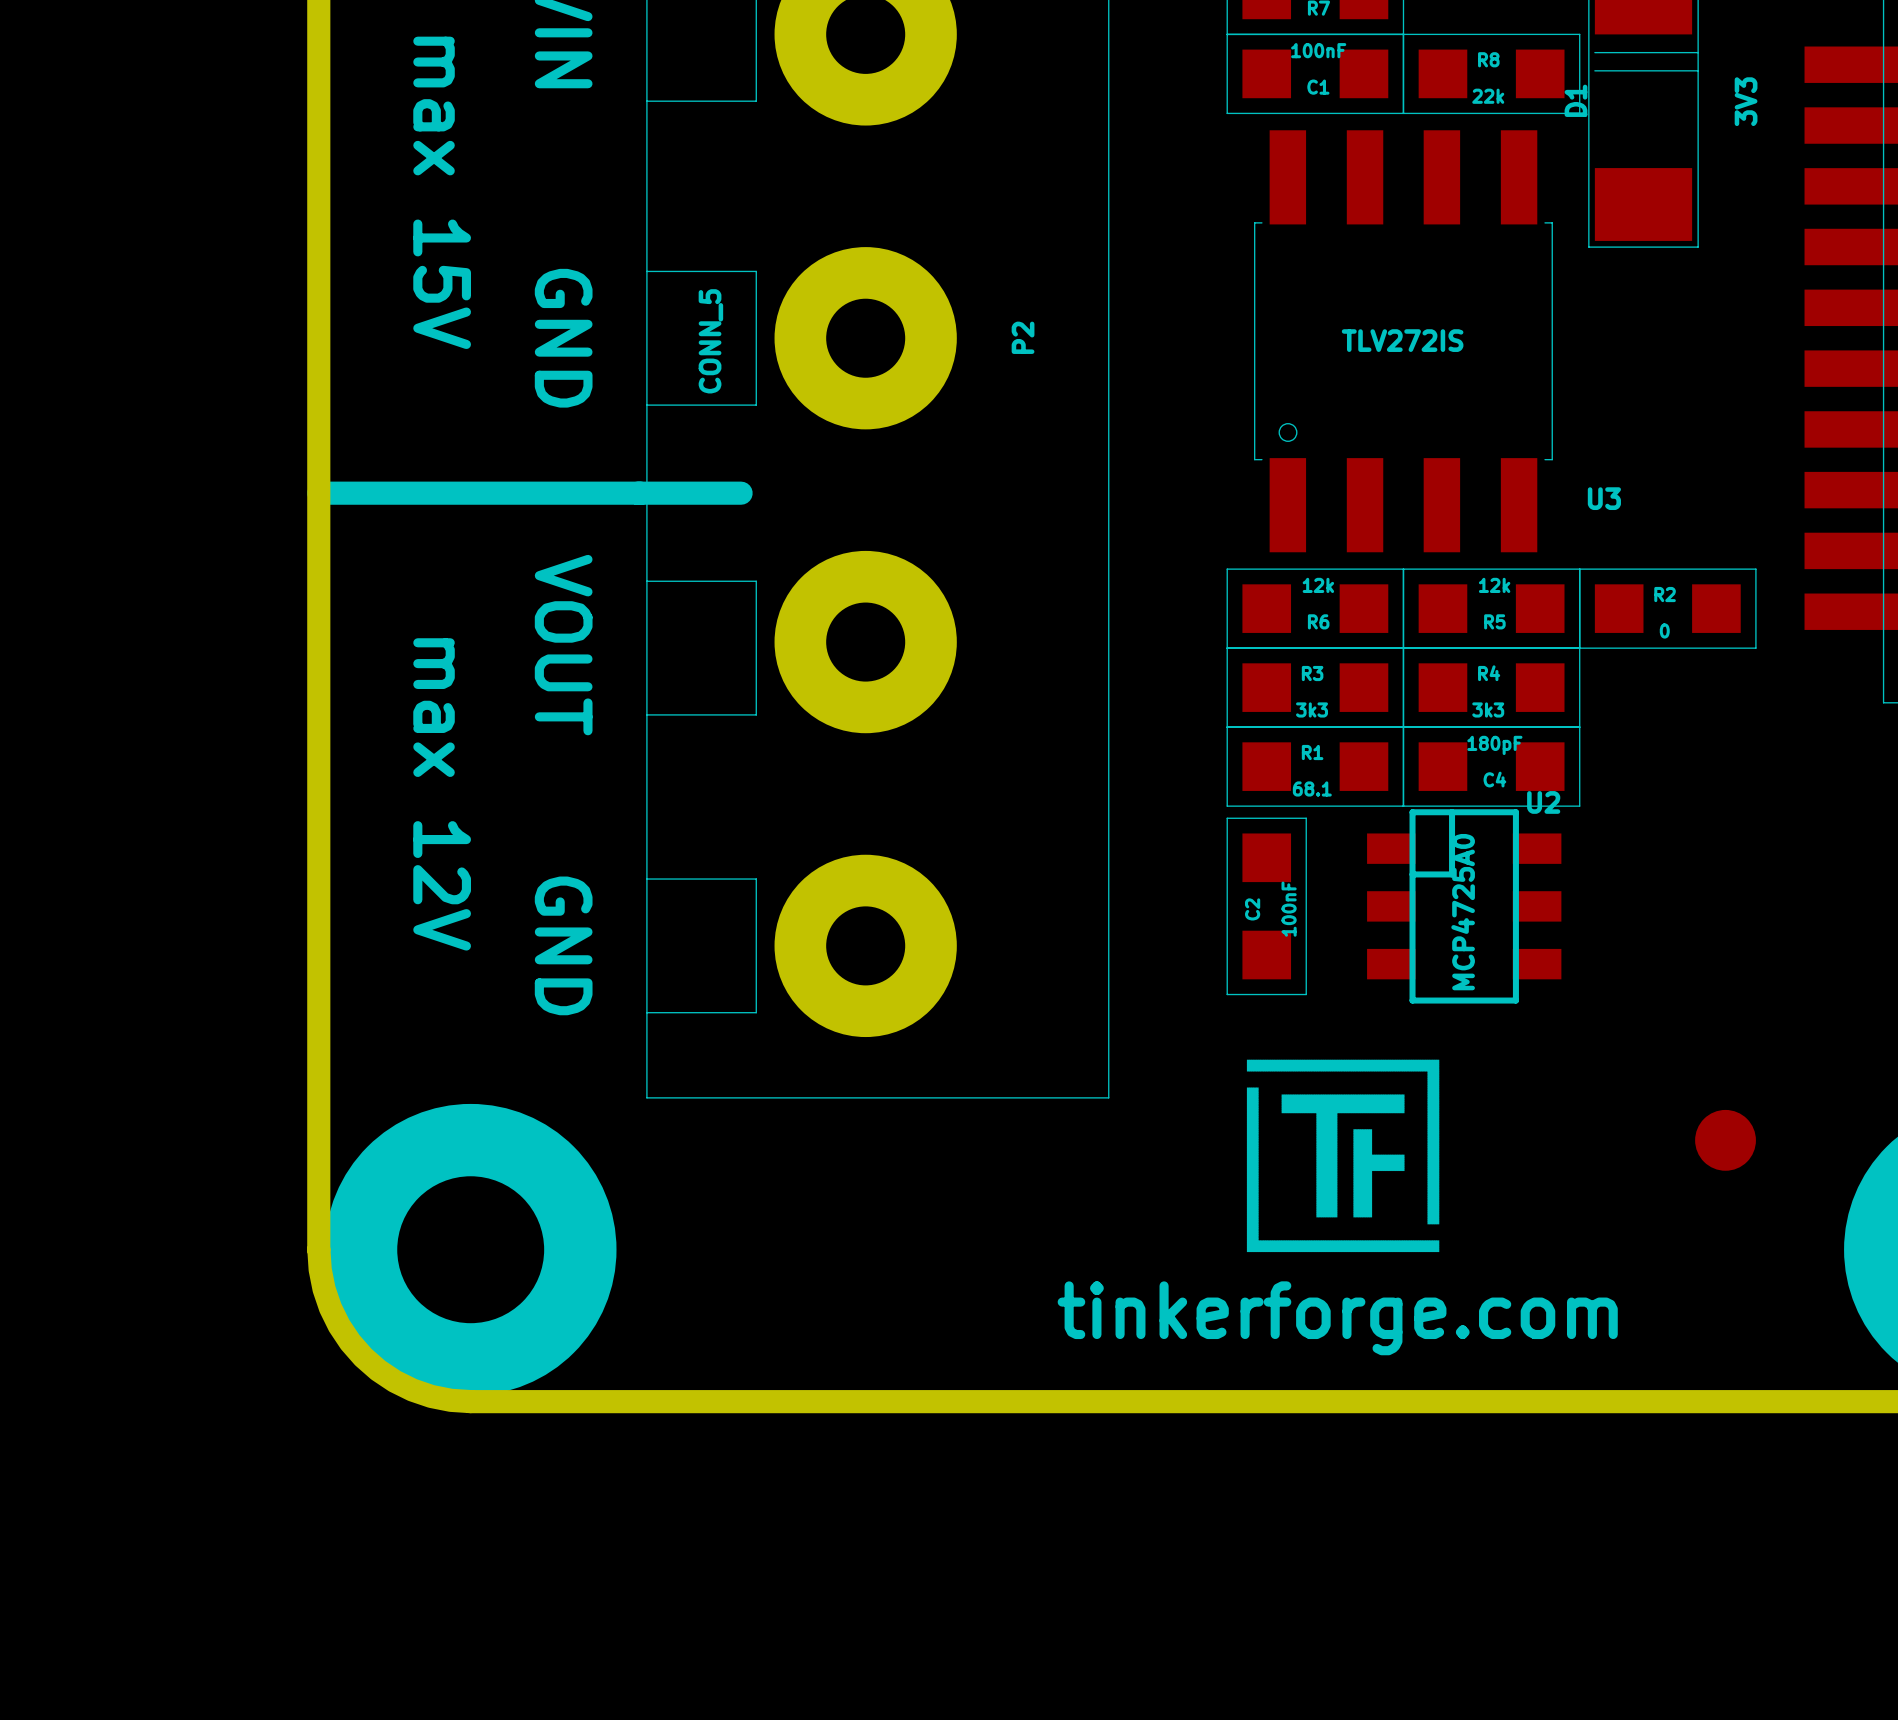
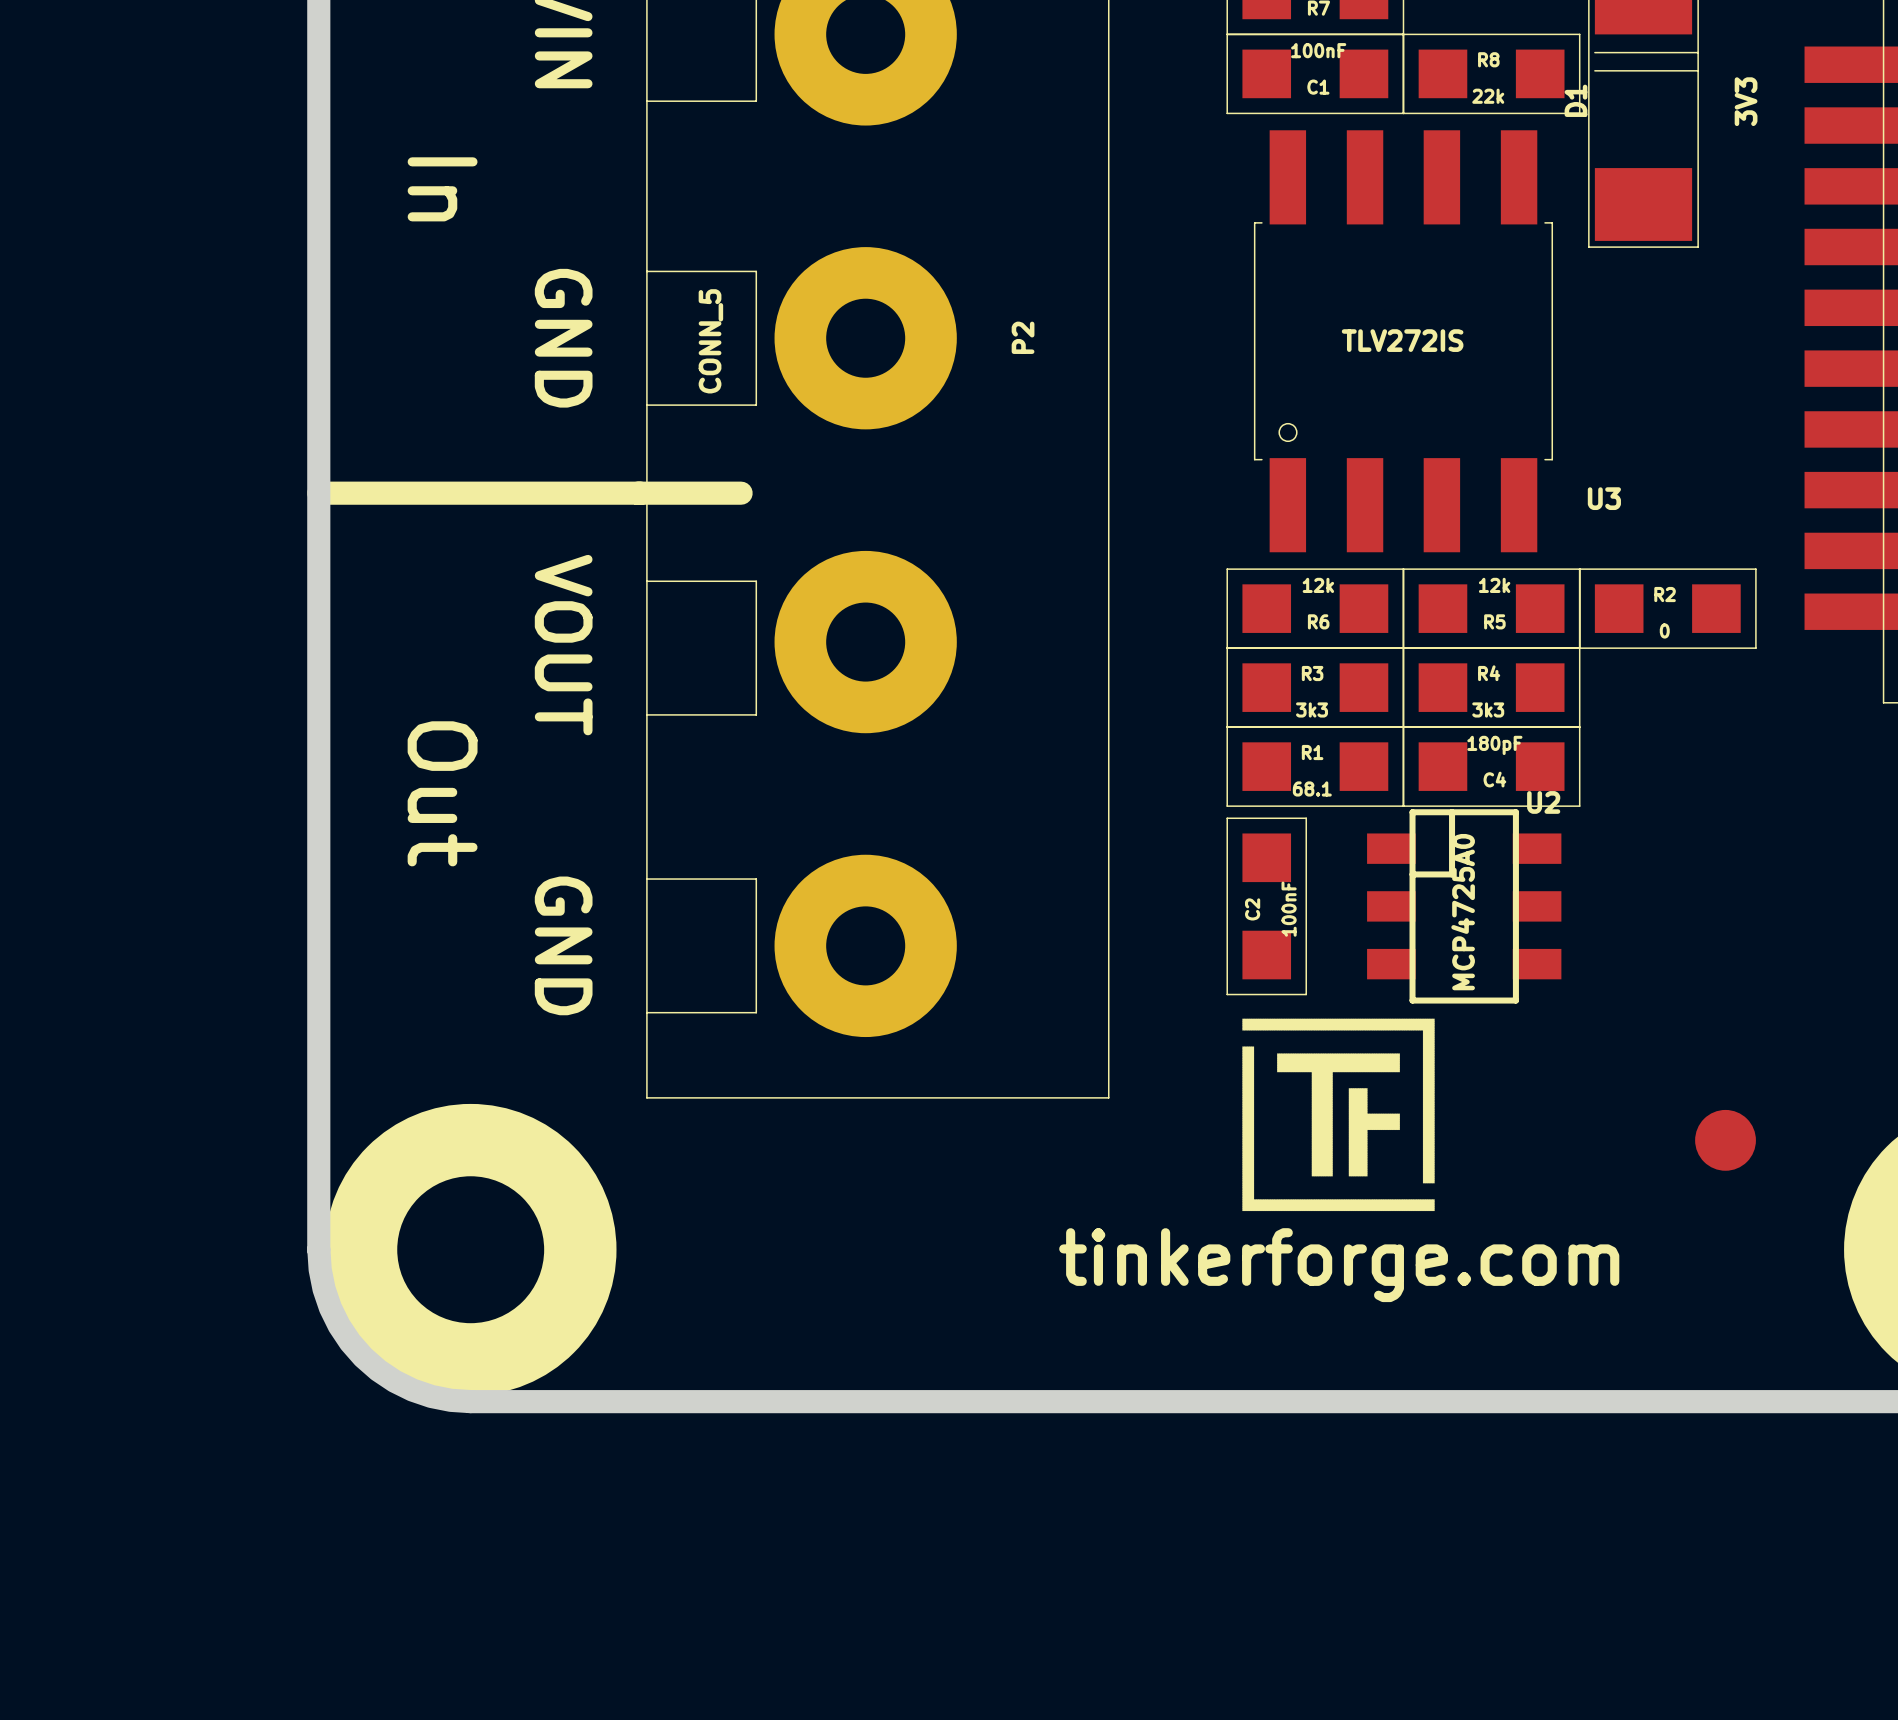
text: max 15V (442, 192) -> In (442, 189)
text: max 12V (442, 794) -> Out (442, 793)
drawing position: (1343, 1155) -> (1338, 1114)
text position: tinkerforge.com (1337, 1318) -> tinkerforge.com (1339, 1265)

